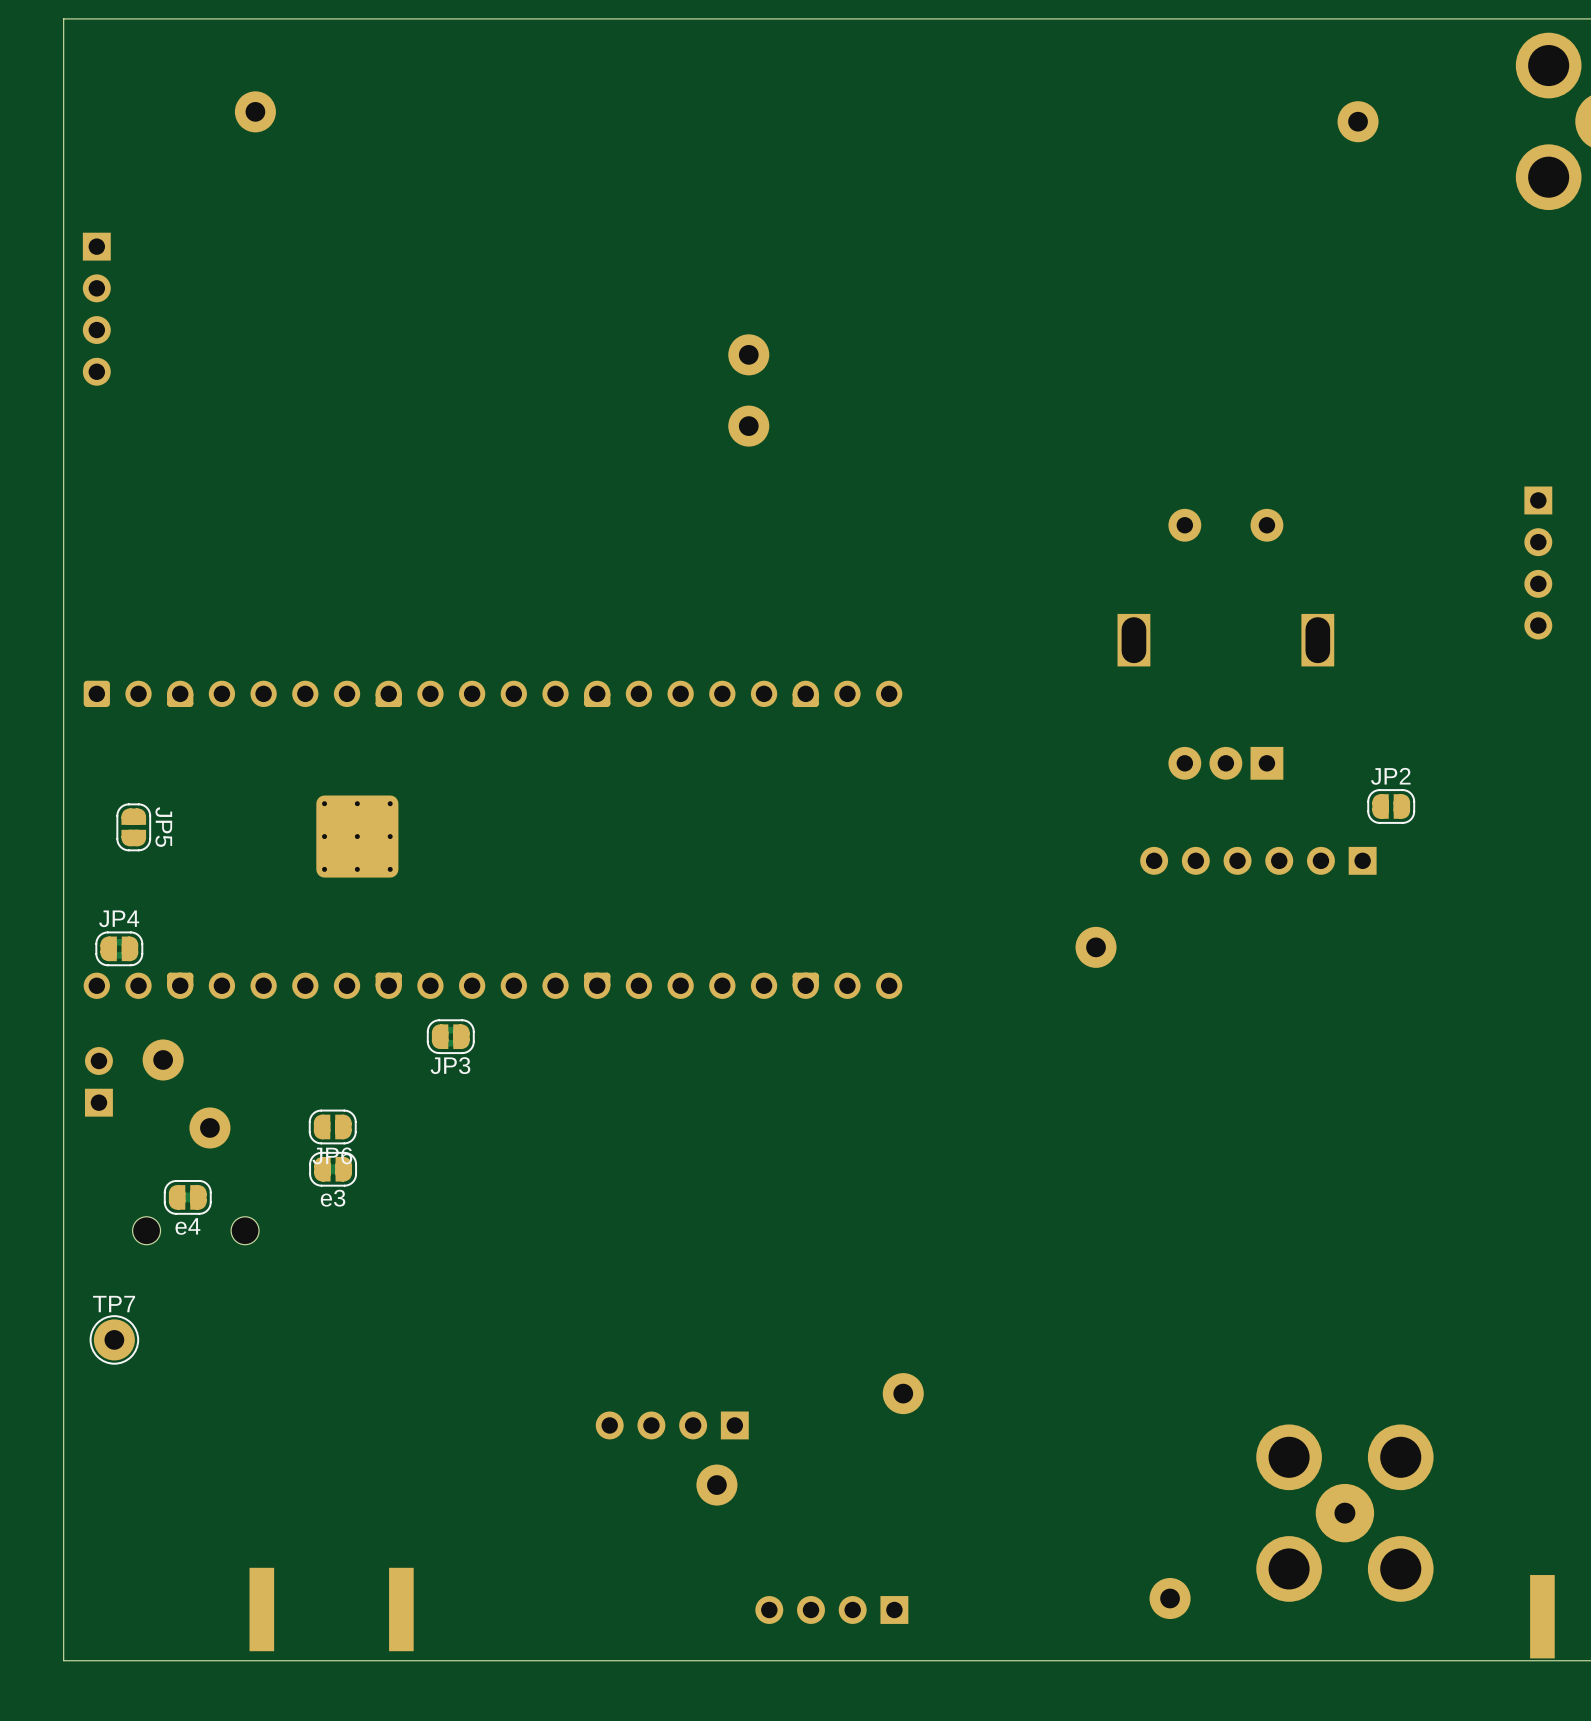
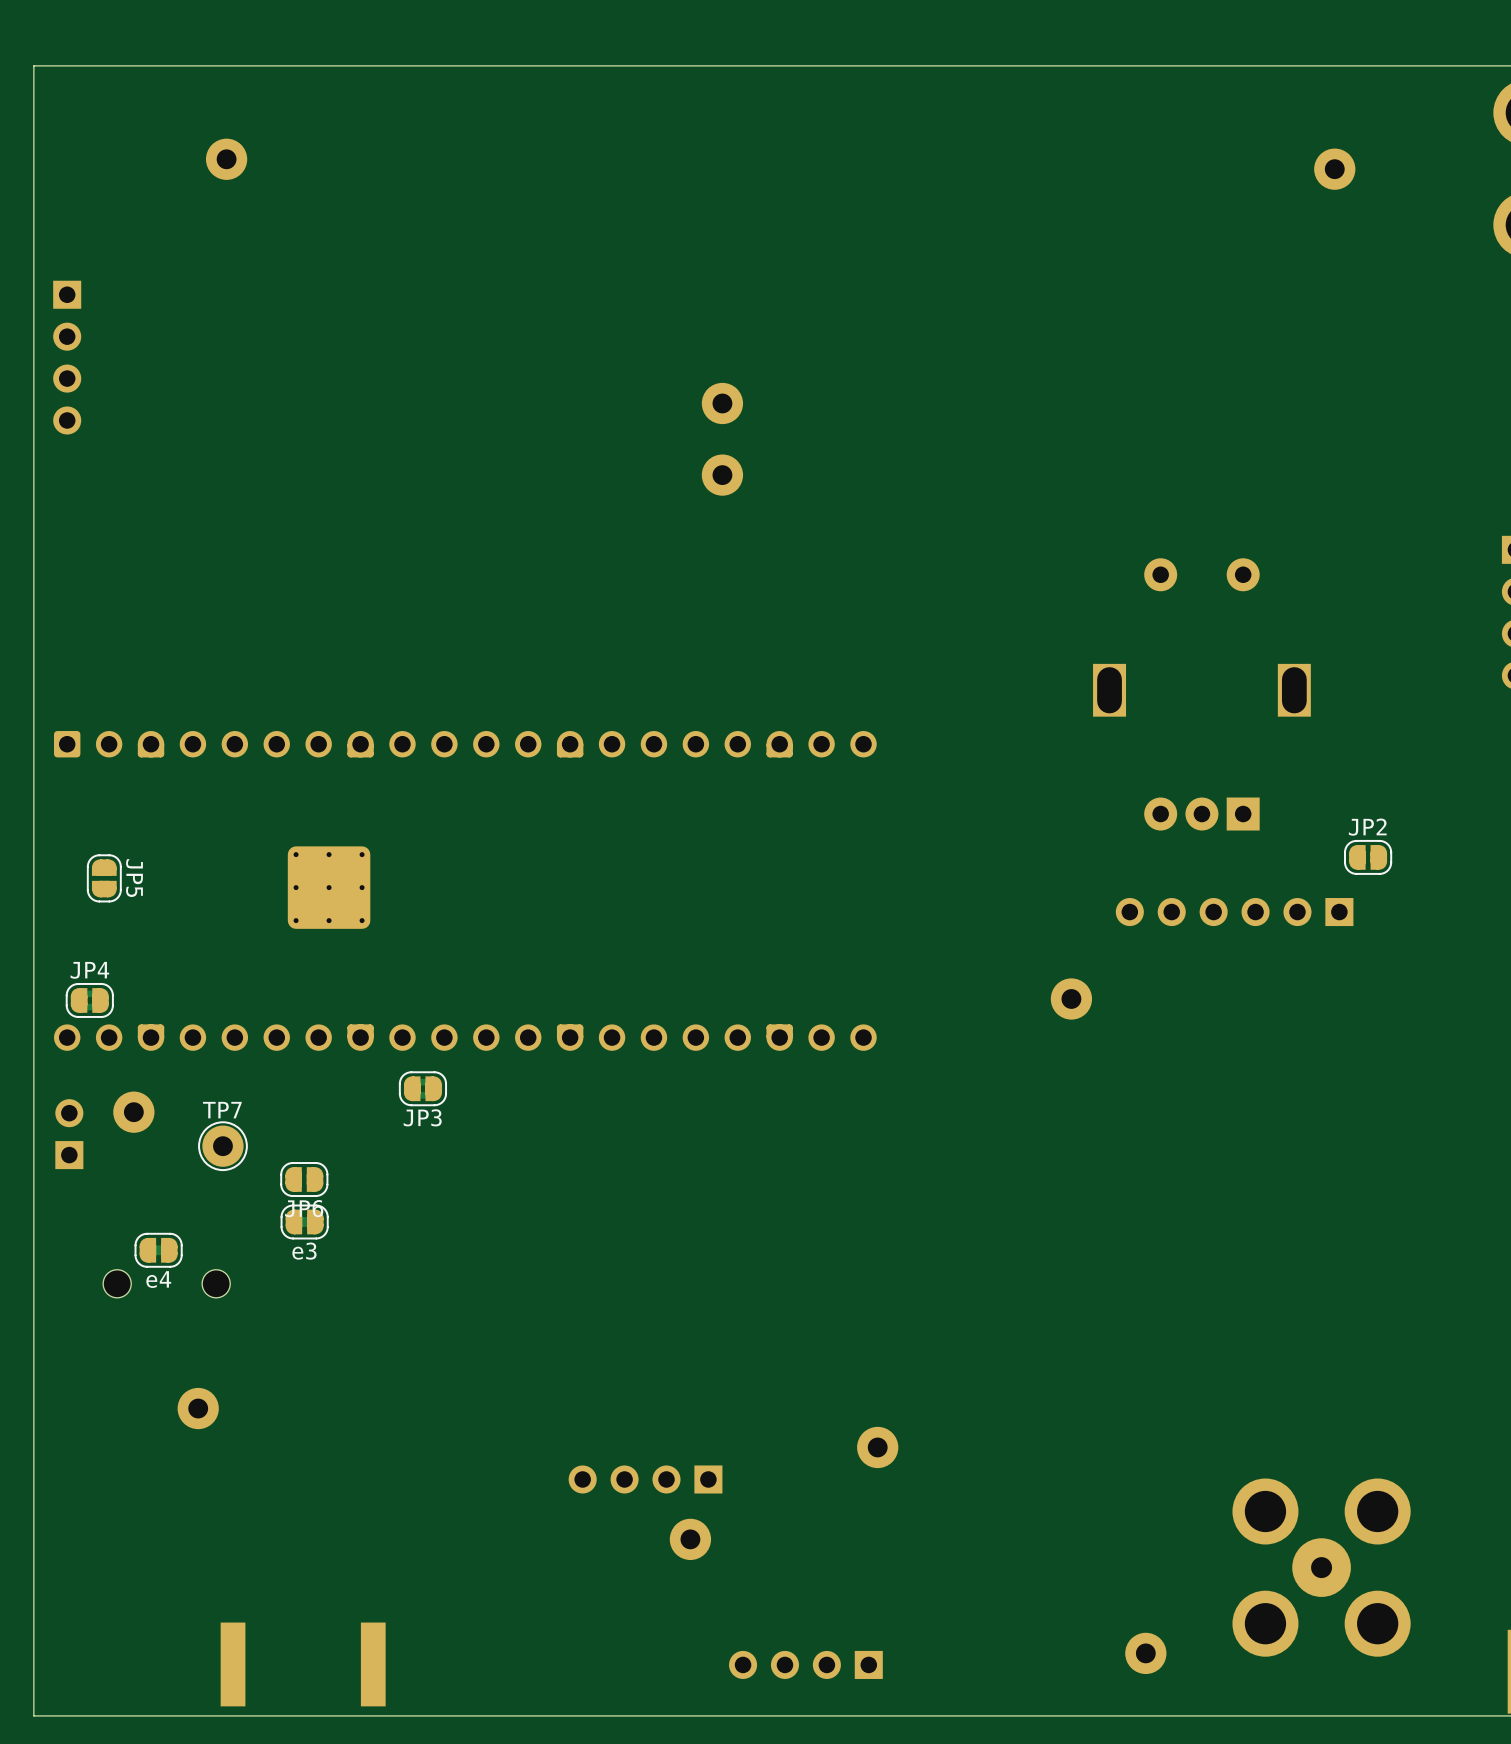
part position: (209, 1127) -> (198, 1408)
TP7 position: (114, 1339) -> (222, 1146)

